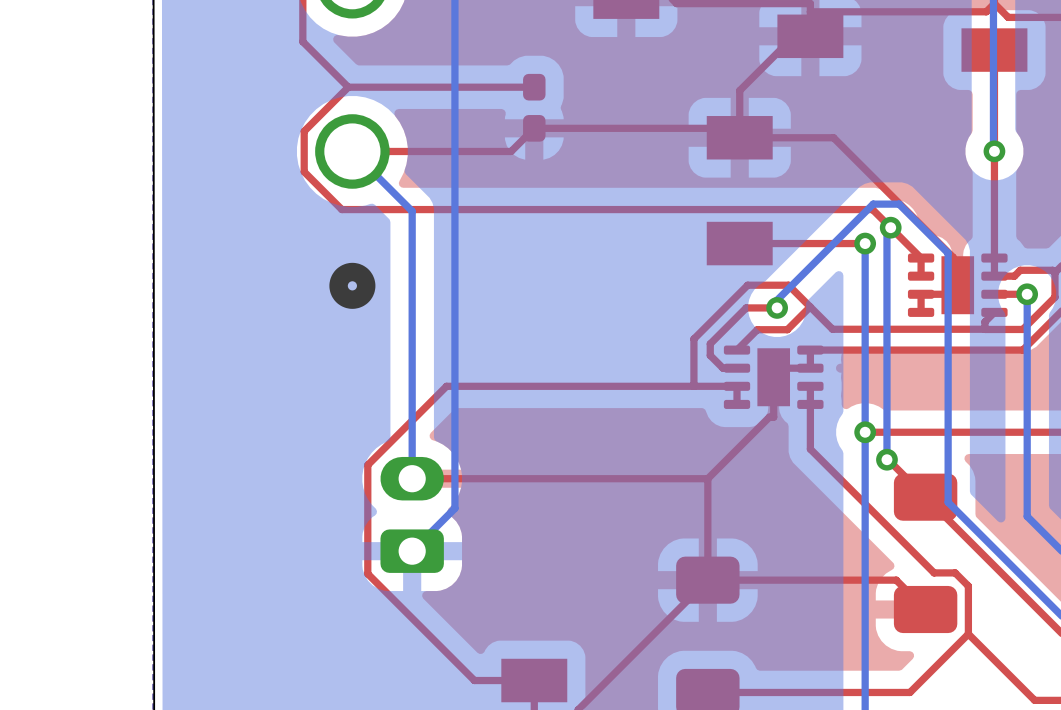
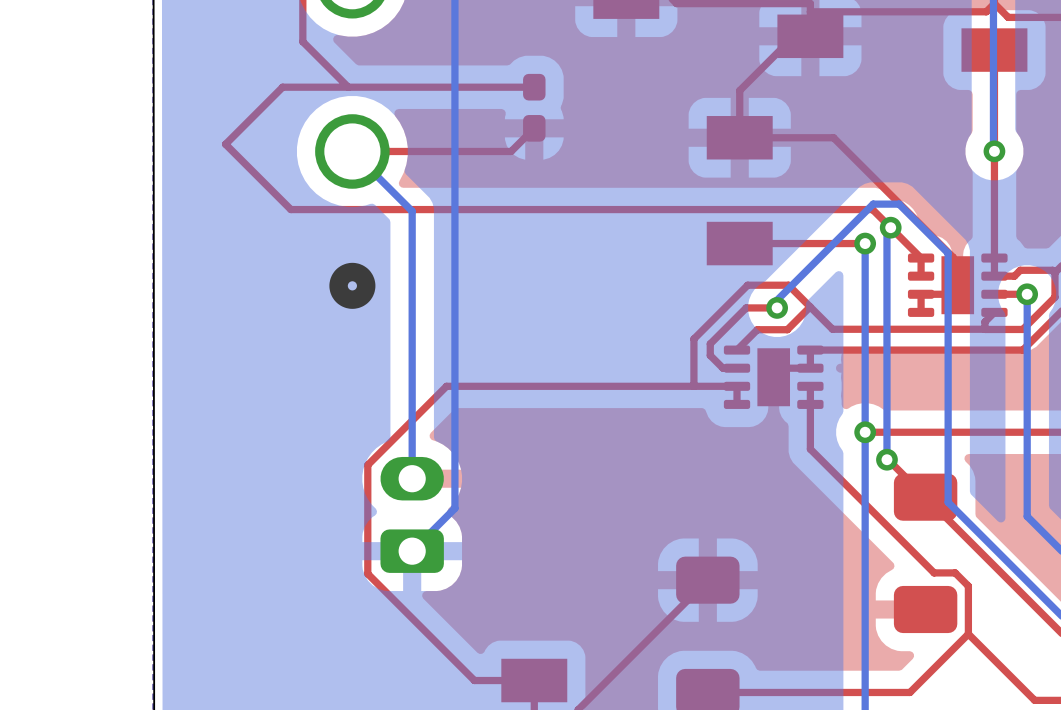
top track: (348, 87) (304, 131) (304, 171) (341, 209) -> (348, 87) (282, 87) (225, 144) (290, 209) (341, 209)
top track: (739, 128) (534, 128) -> none
top track: (773, 377) (773, 417) (769, 417) (707, 478) -> none
top track: (707, 478) (707, 580) (896, 580) (925, 609) -> none
top track: (707, 478) (412, 478) -> none

